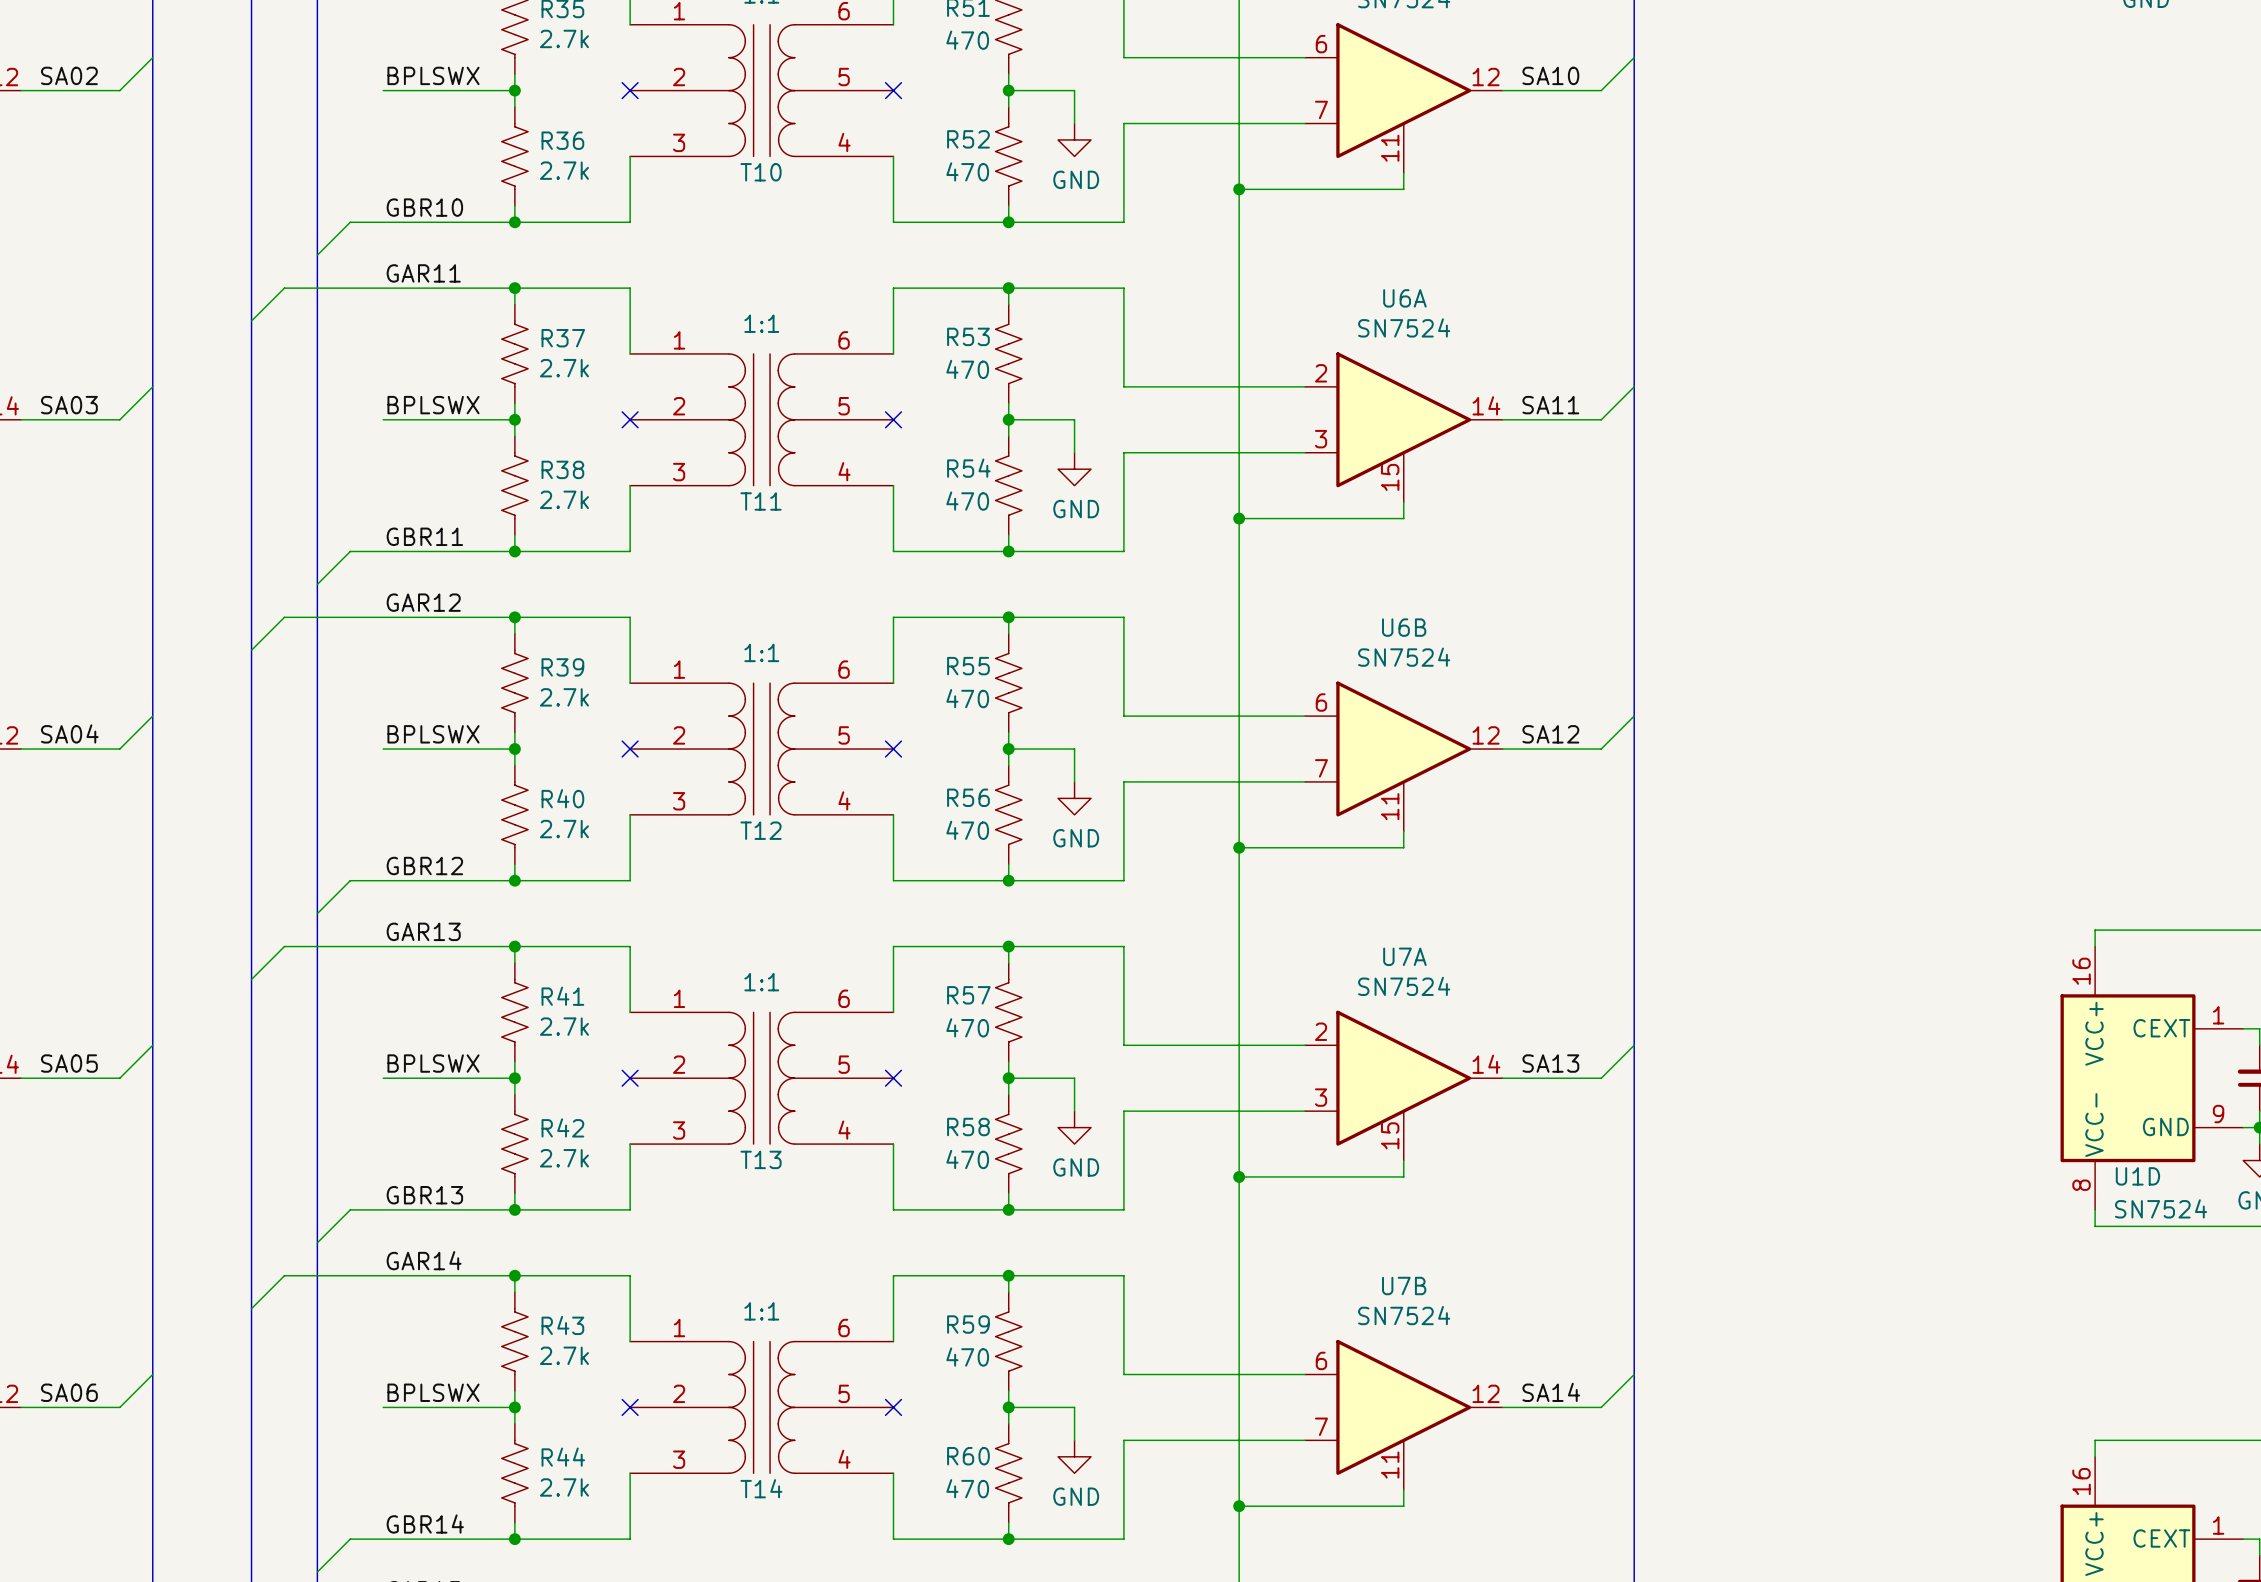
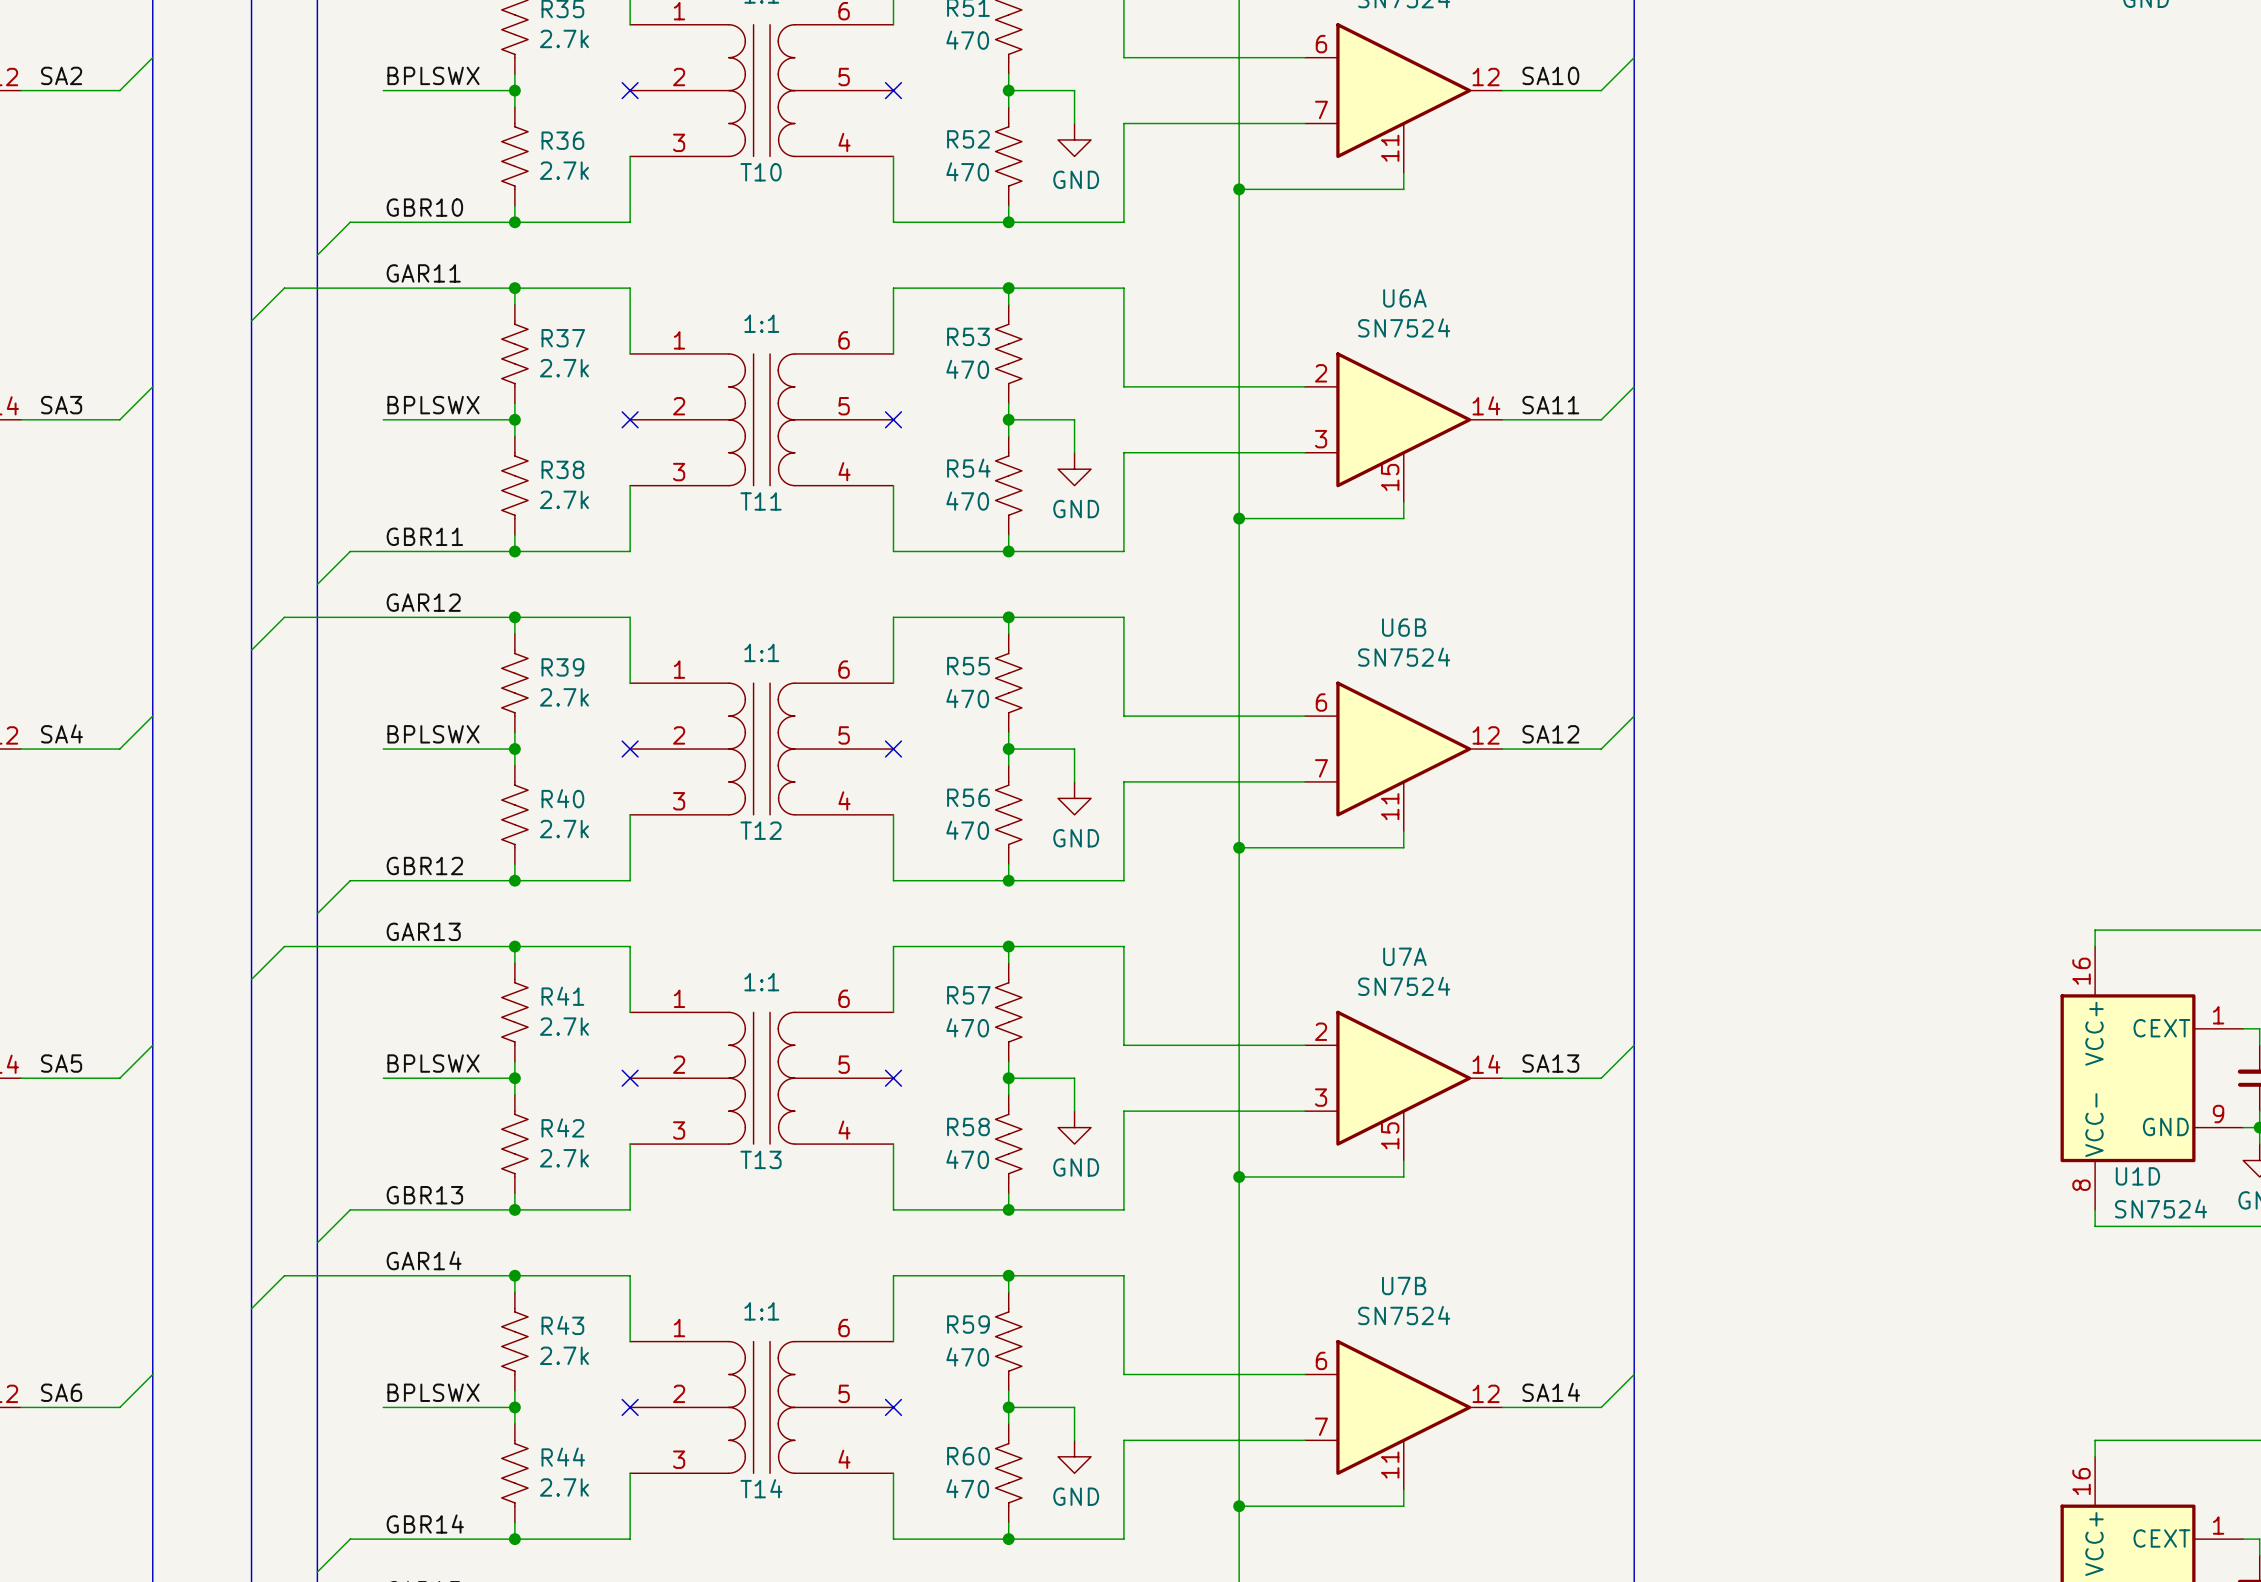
label: SA02 (69, 75) -> SA2 (61, 75)
label: SA03 (69, 405) -> SA3 (61, 405)
label: SA04 (69, 733) -> SA4 (61, 733)
label: SA05 (69, 1063) -> SA5 (61, 1063)
label: SA06 (69, 1392) -> SA6 (61, 1392)

